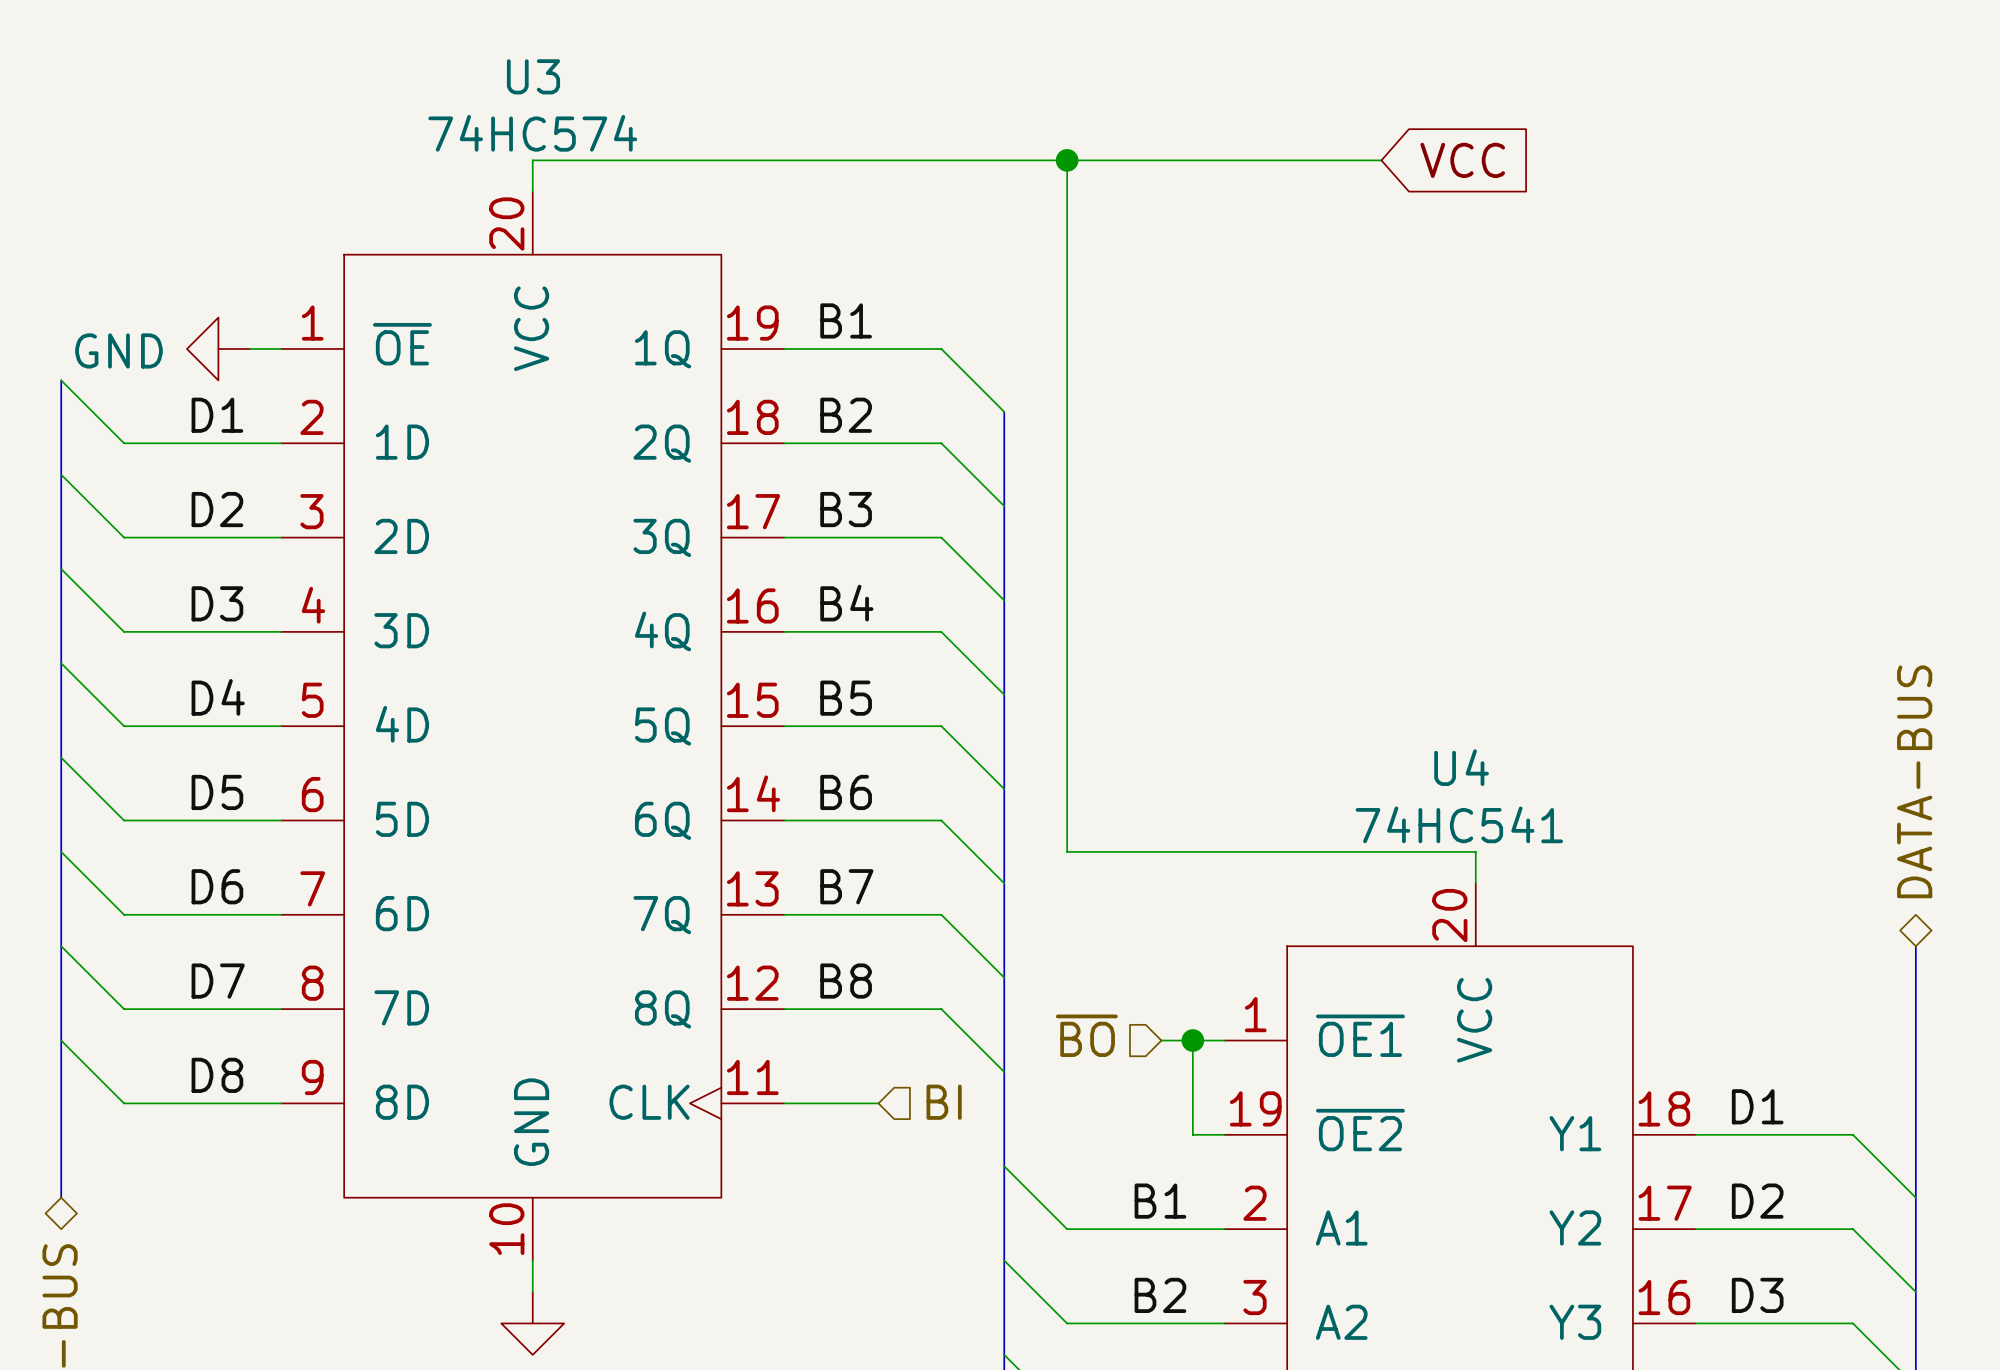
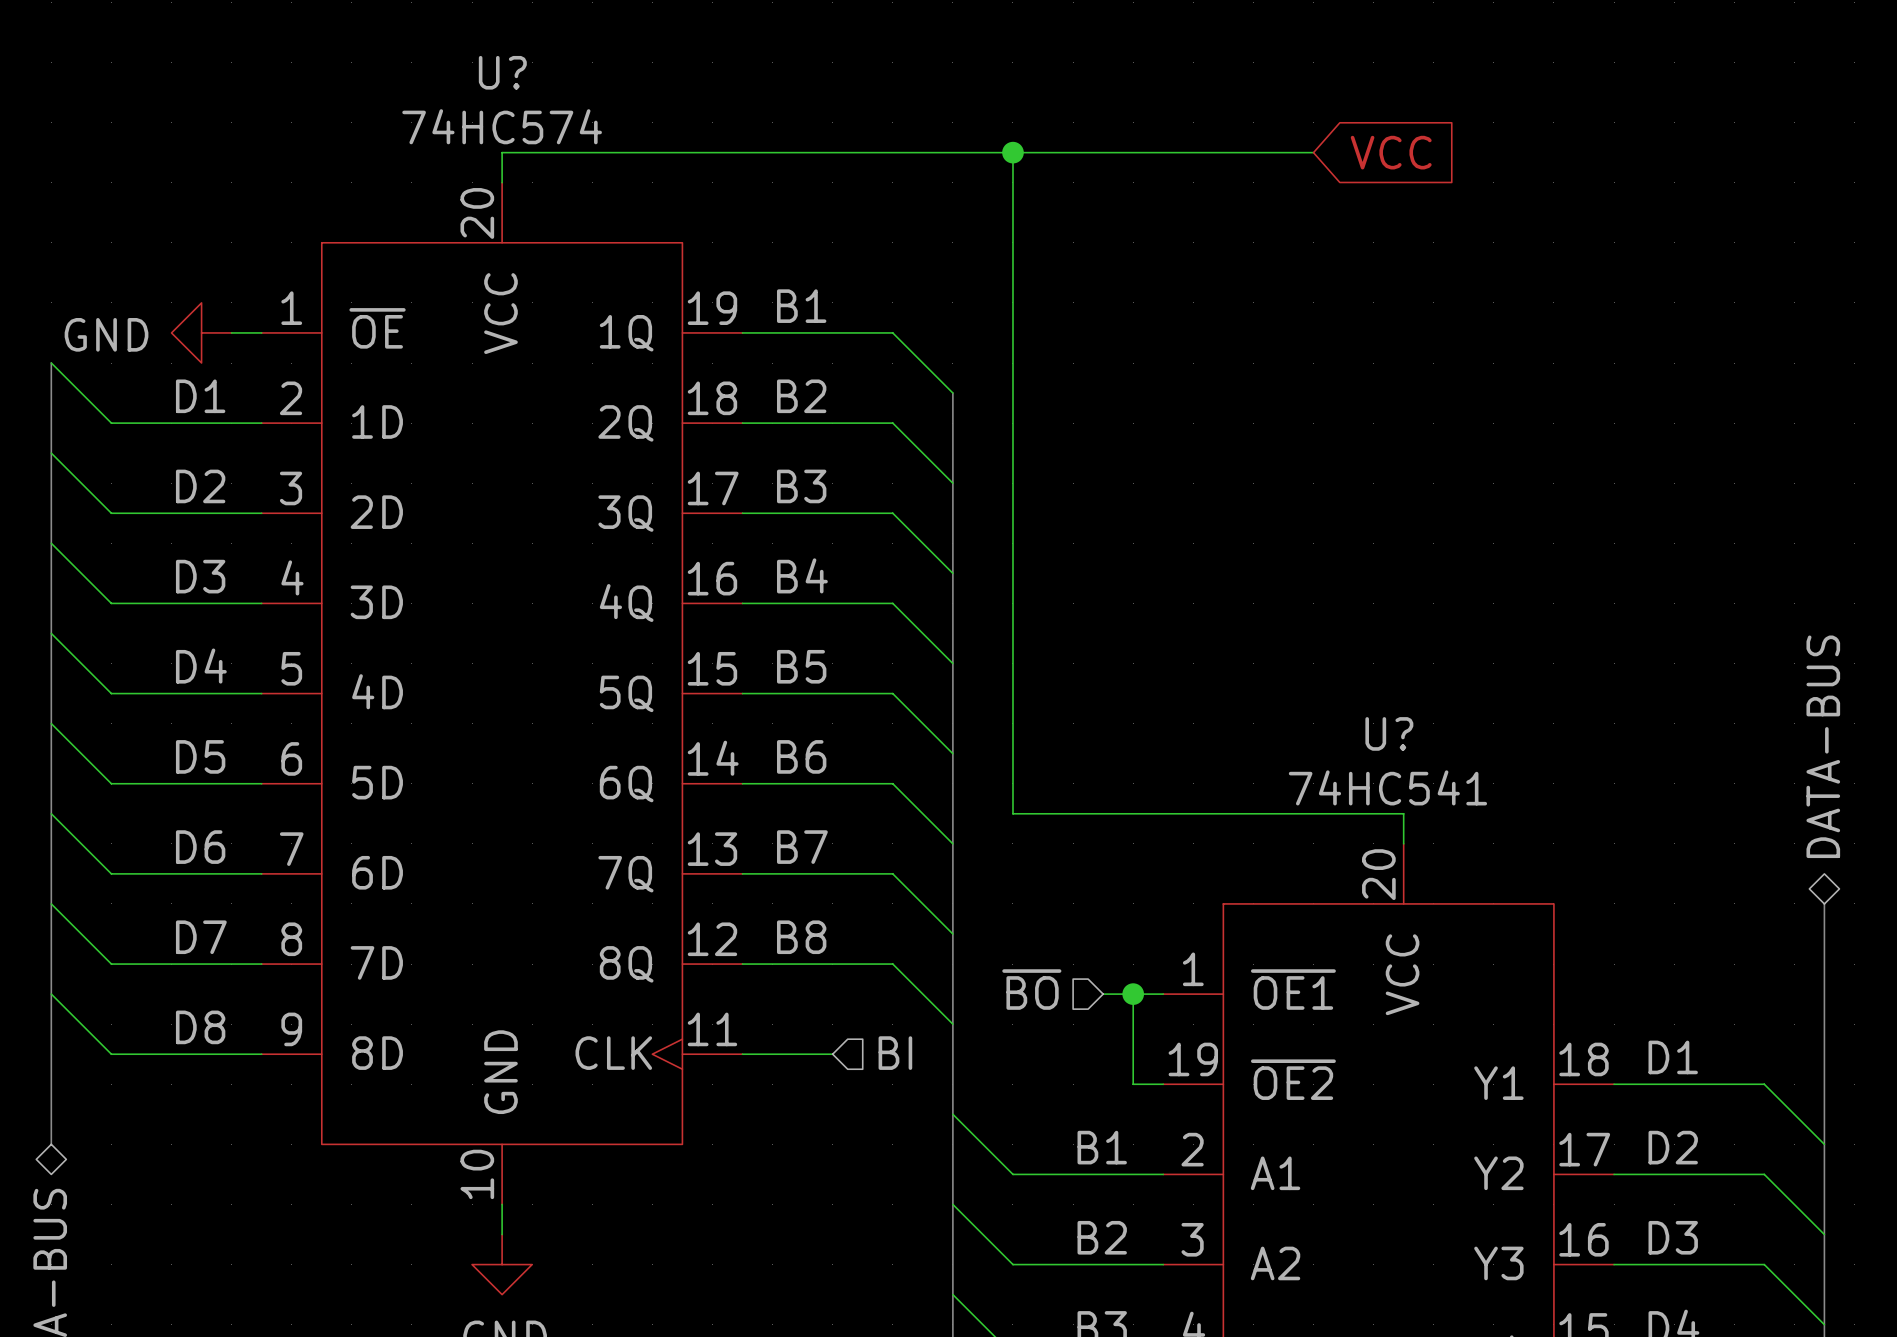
U3 name: U3 (533, 76) -> U? (502, 72)
U4 name: U4 (1461, 767) -> U? (1389, 733)

